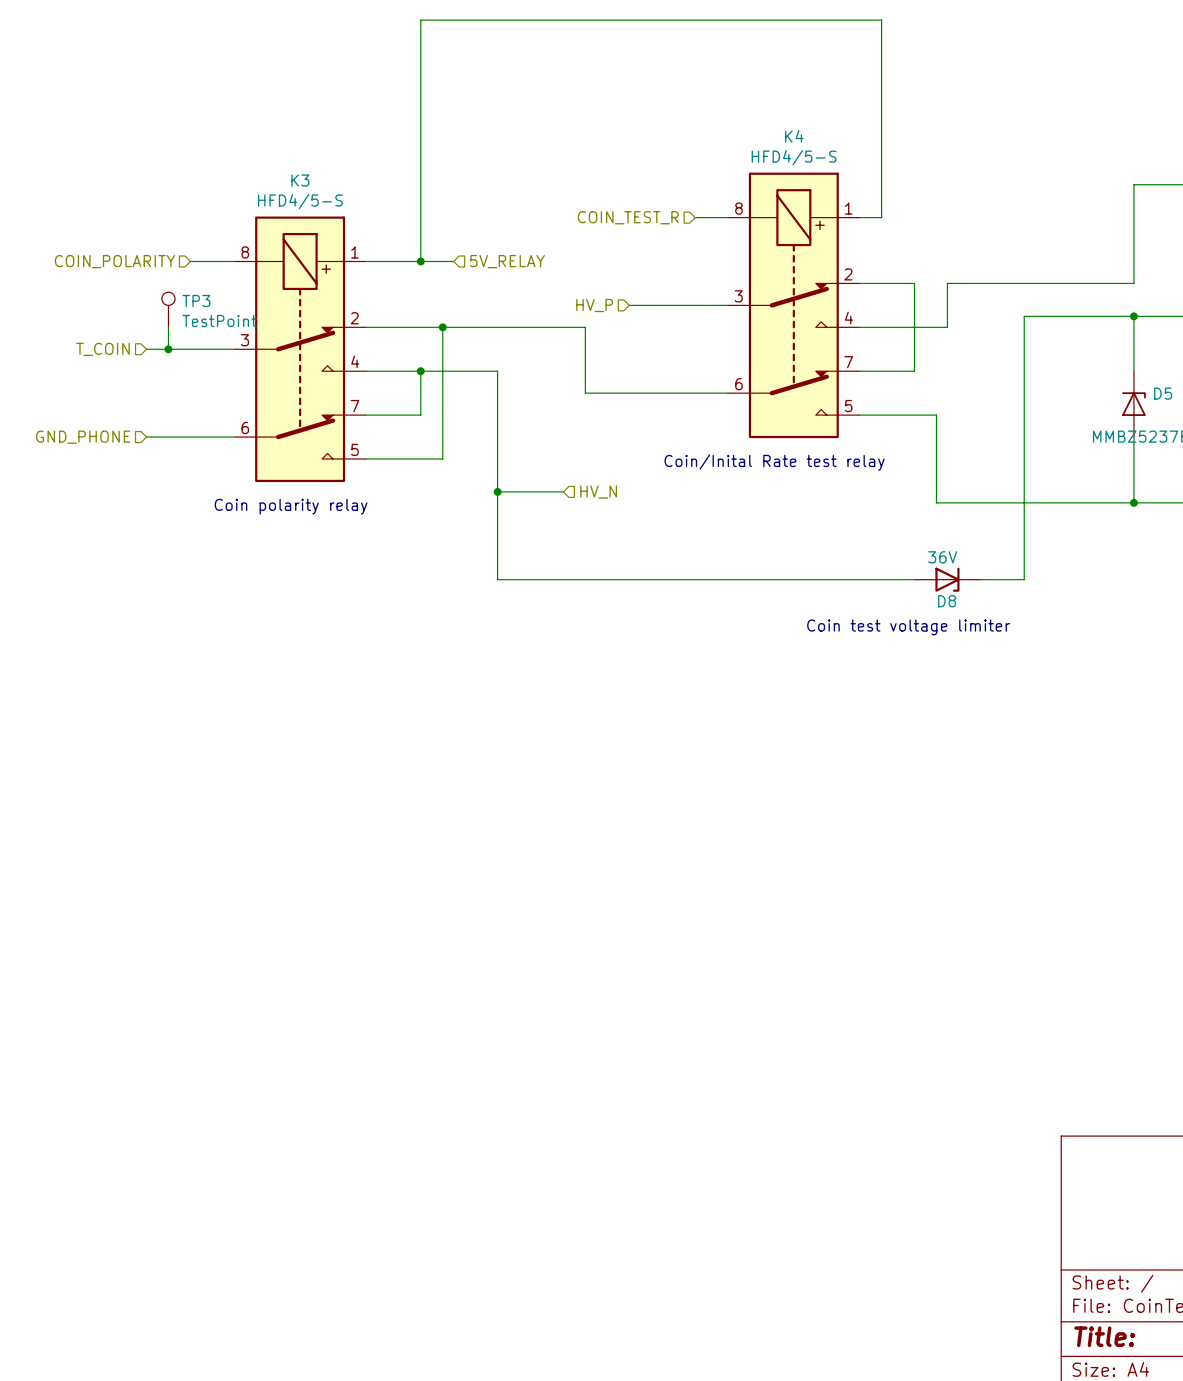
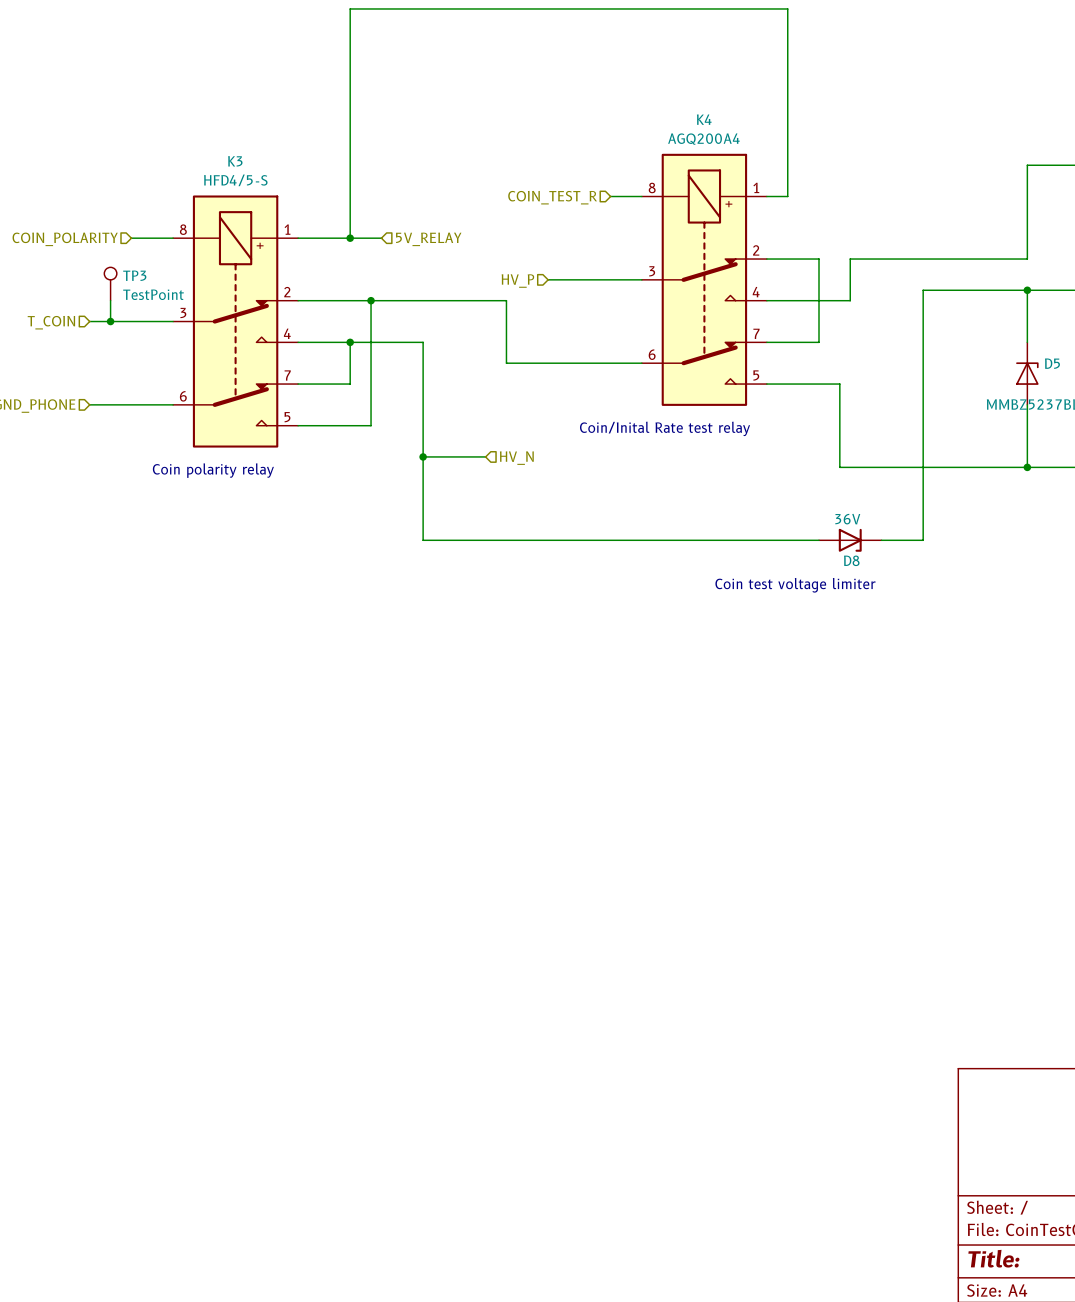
K4 value: HFD4/5-S (794, 157) -> AGQ200A4 (703, 139)

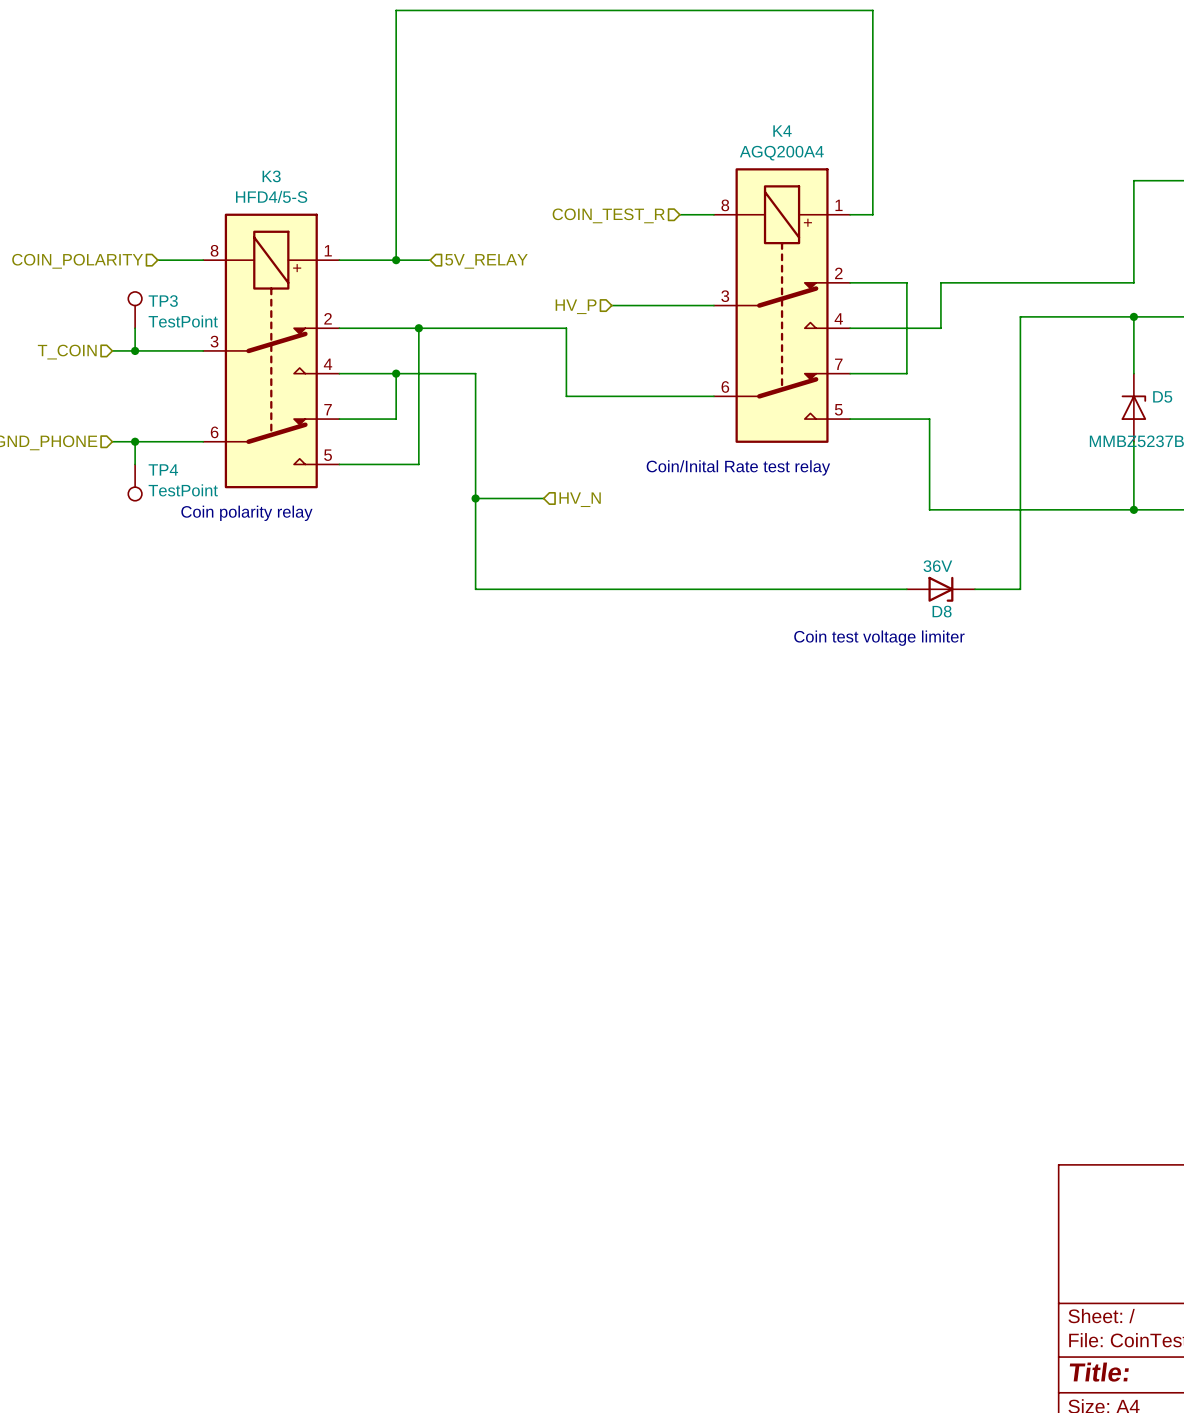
wire: none -> (135, 441) (135, 464)
junction: none -> (135, 441)
TP4: none -> TestPoint (135, 482)

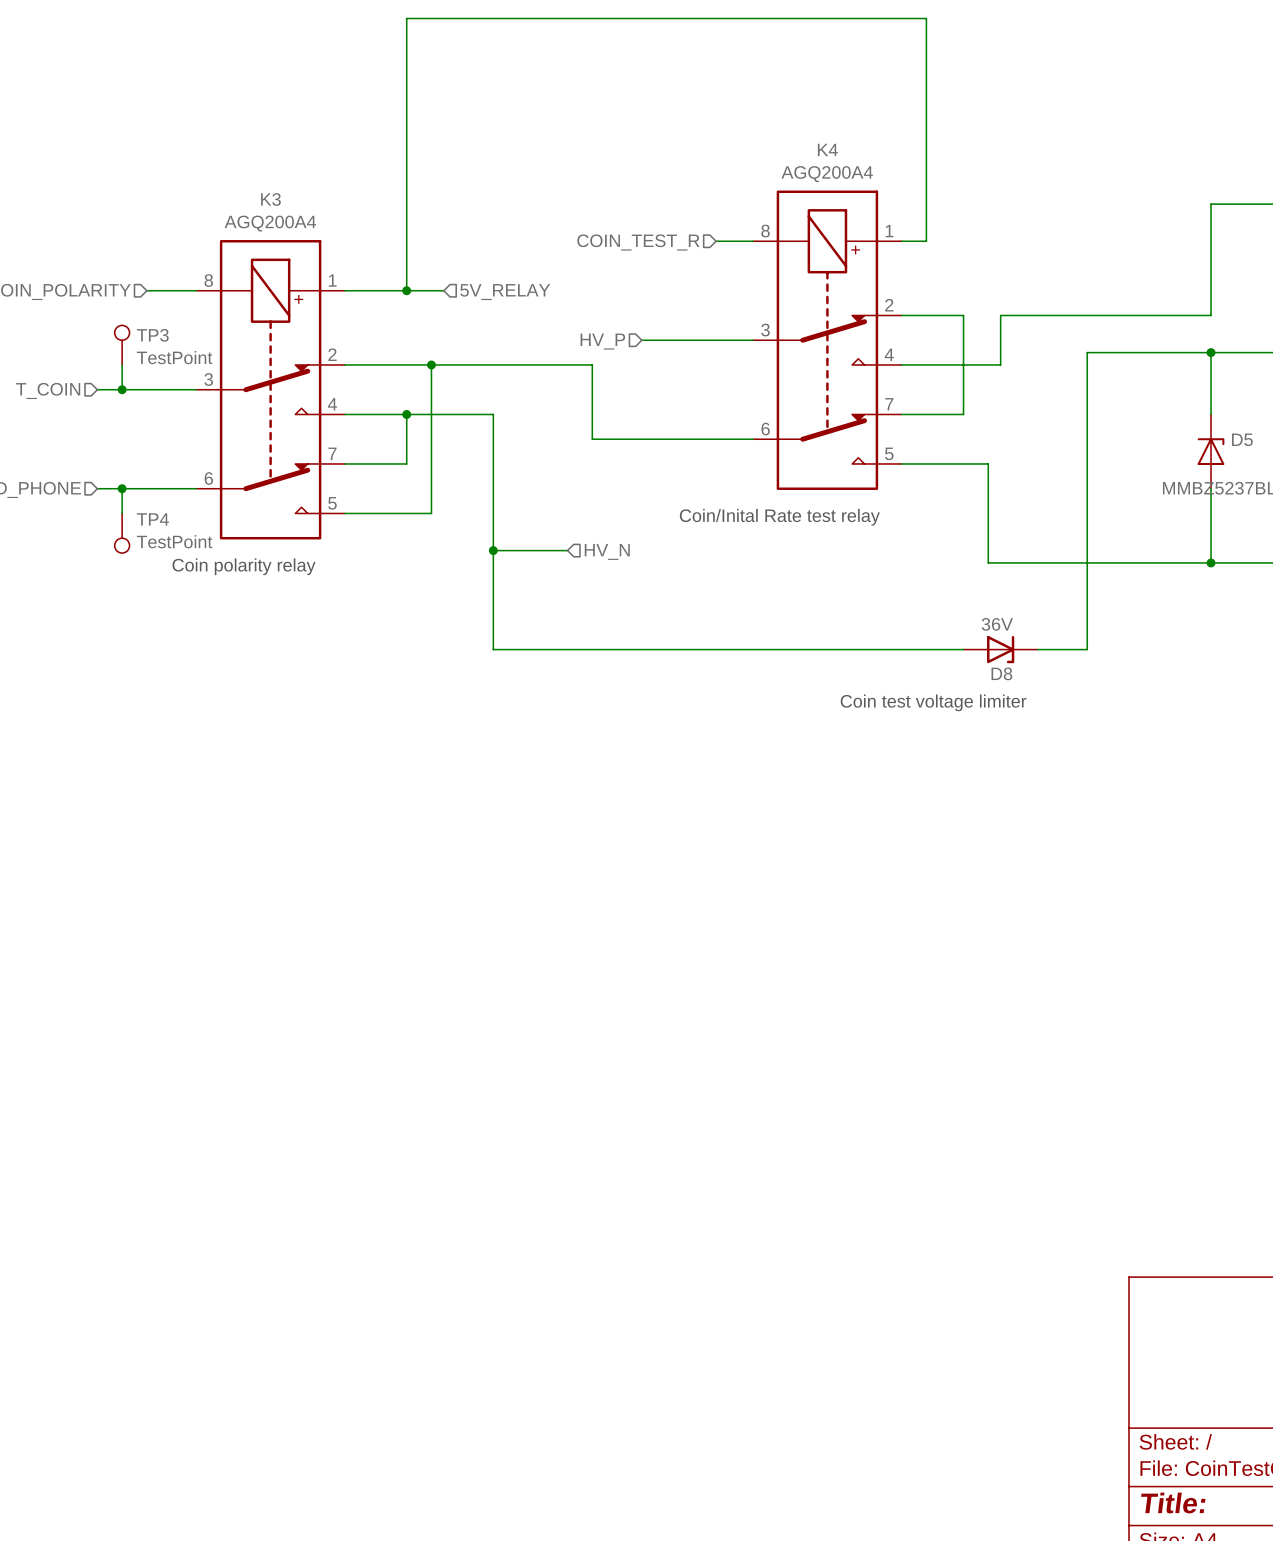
K3 value: HFD4/5-S (271, 196) -> AGQ200A4 (270, 223)

